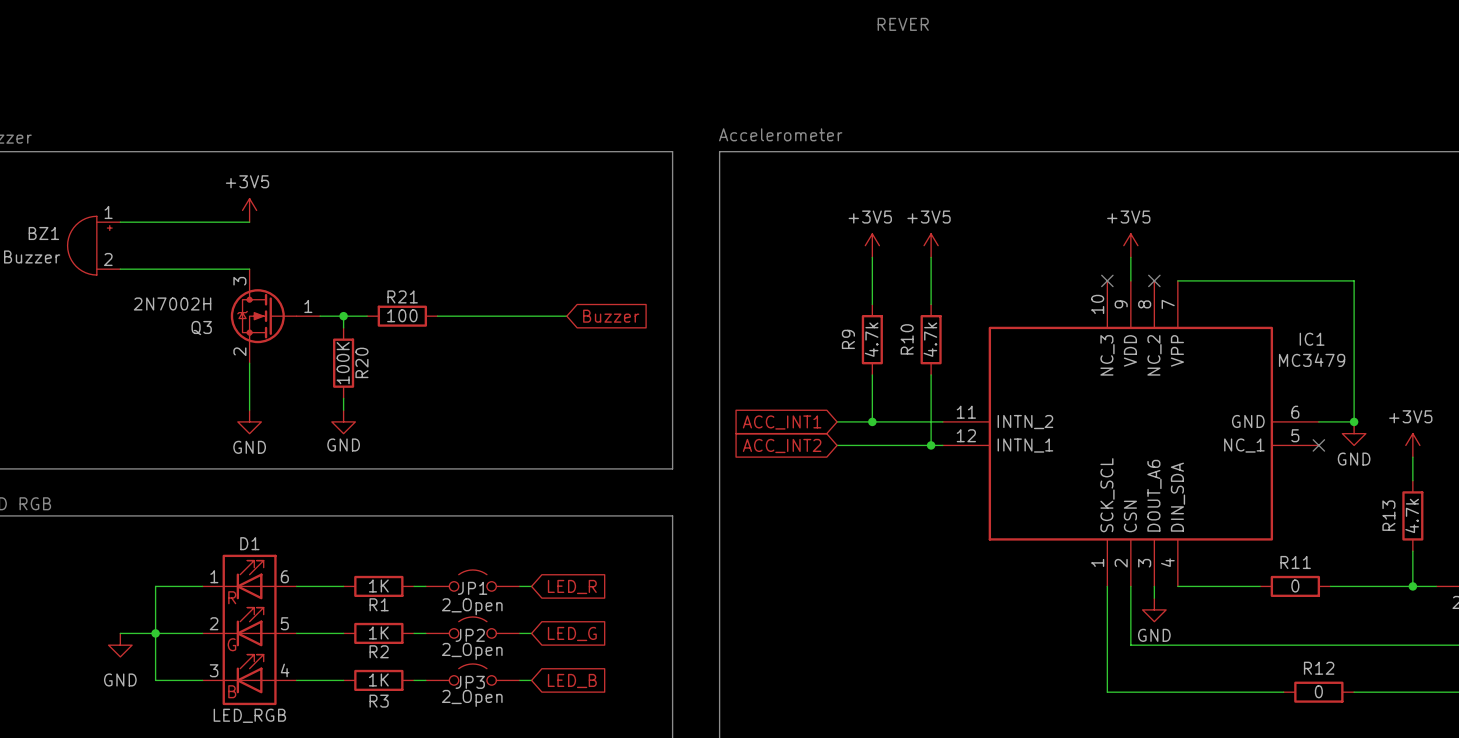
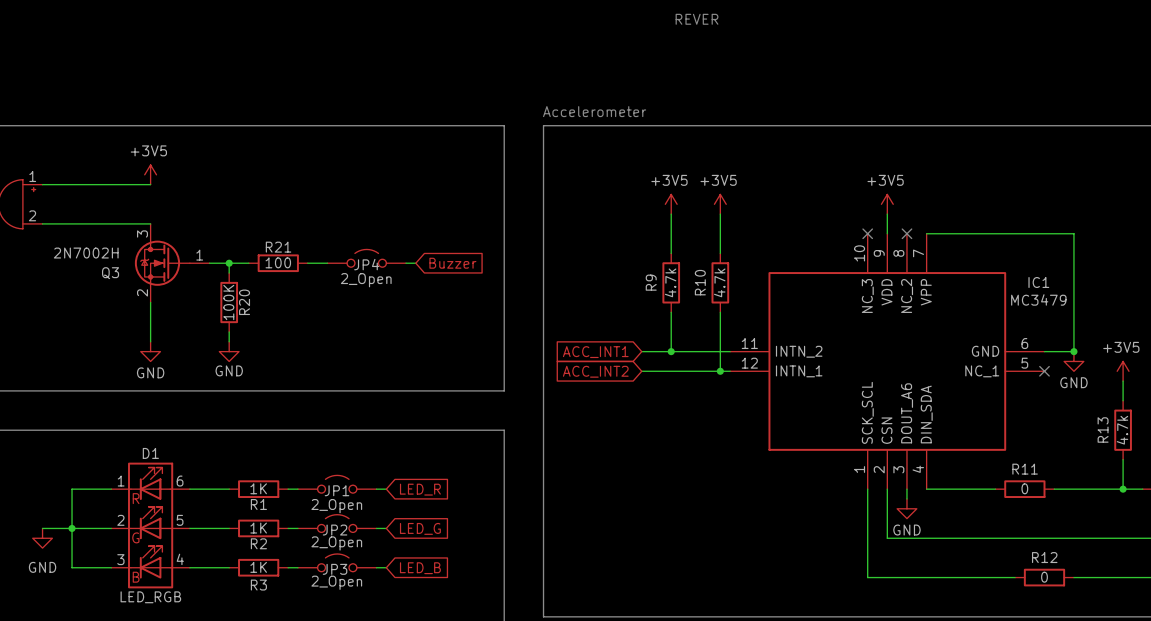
JP4: none -> 2_Open (366, 258)

